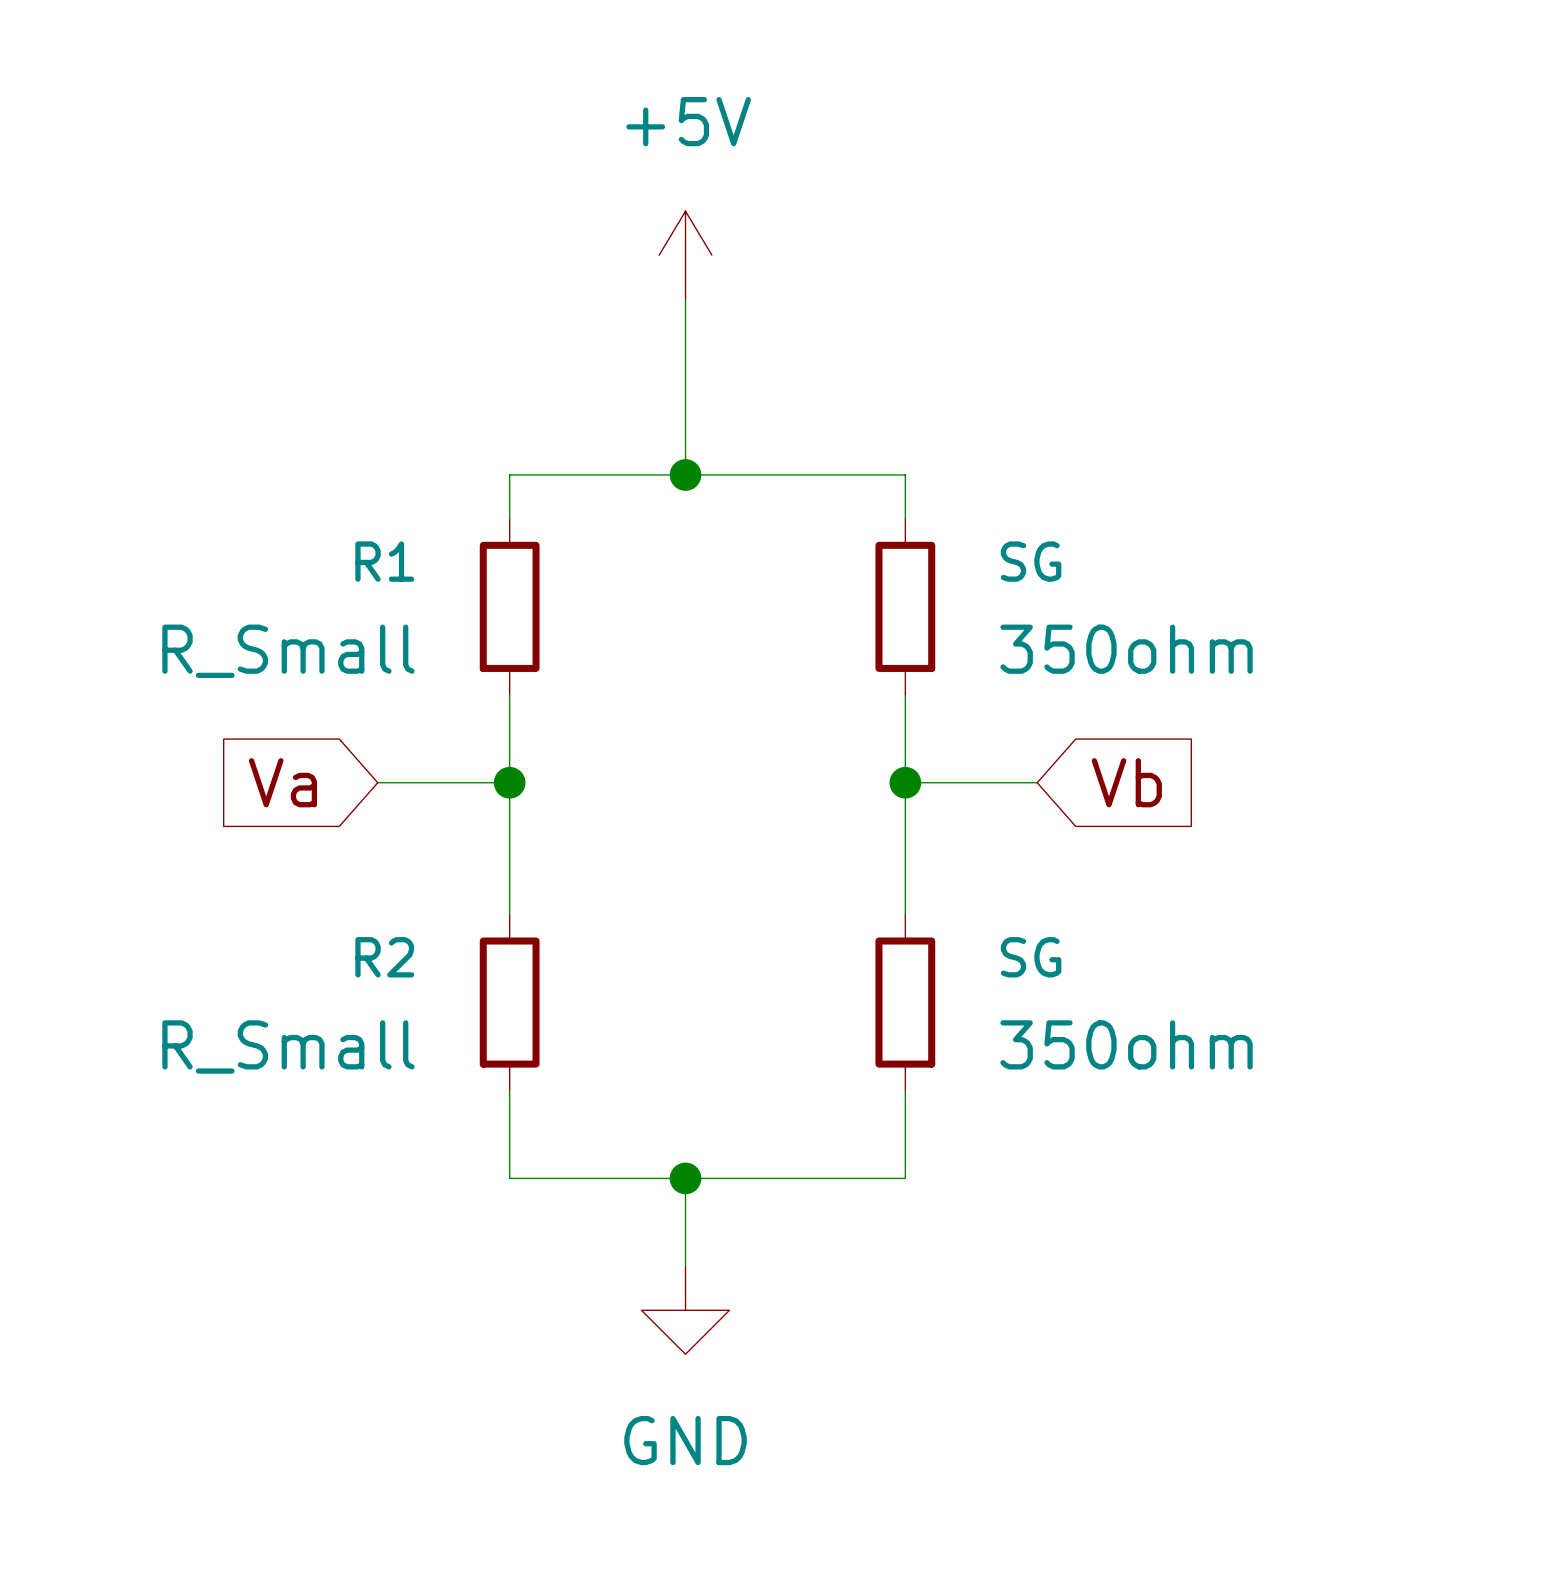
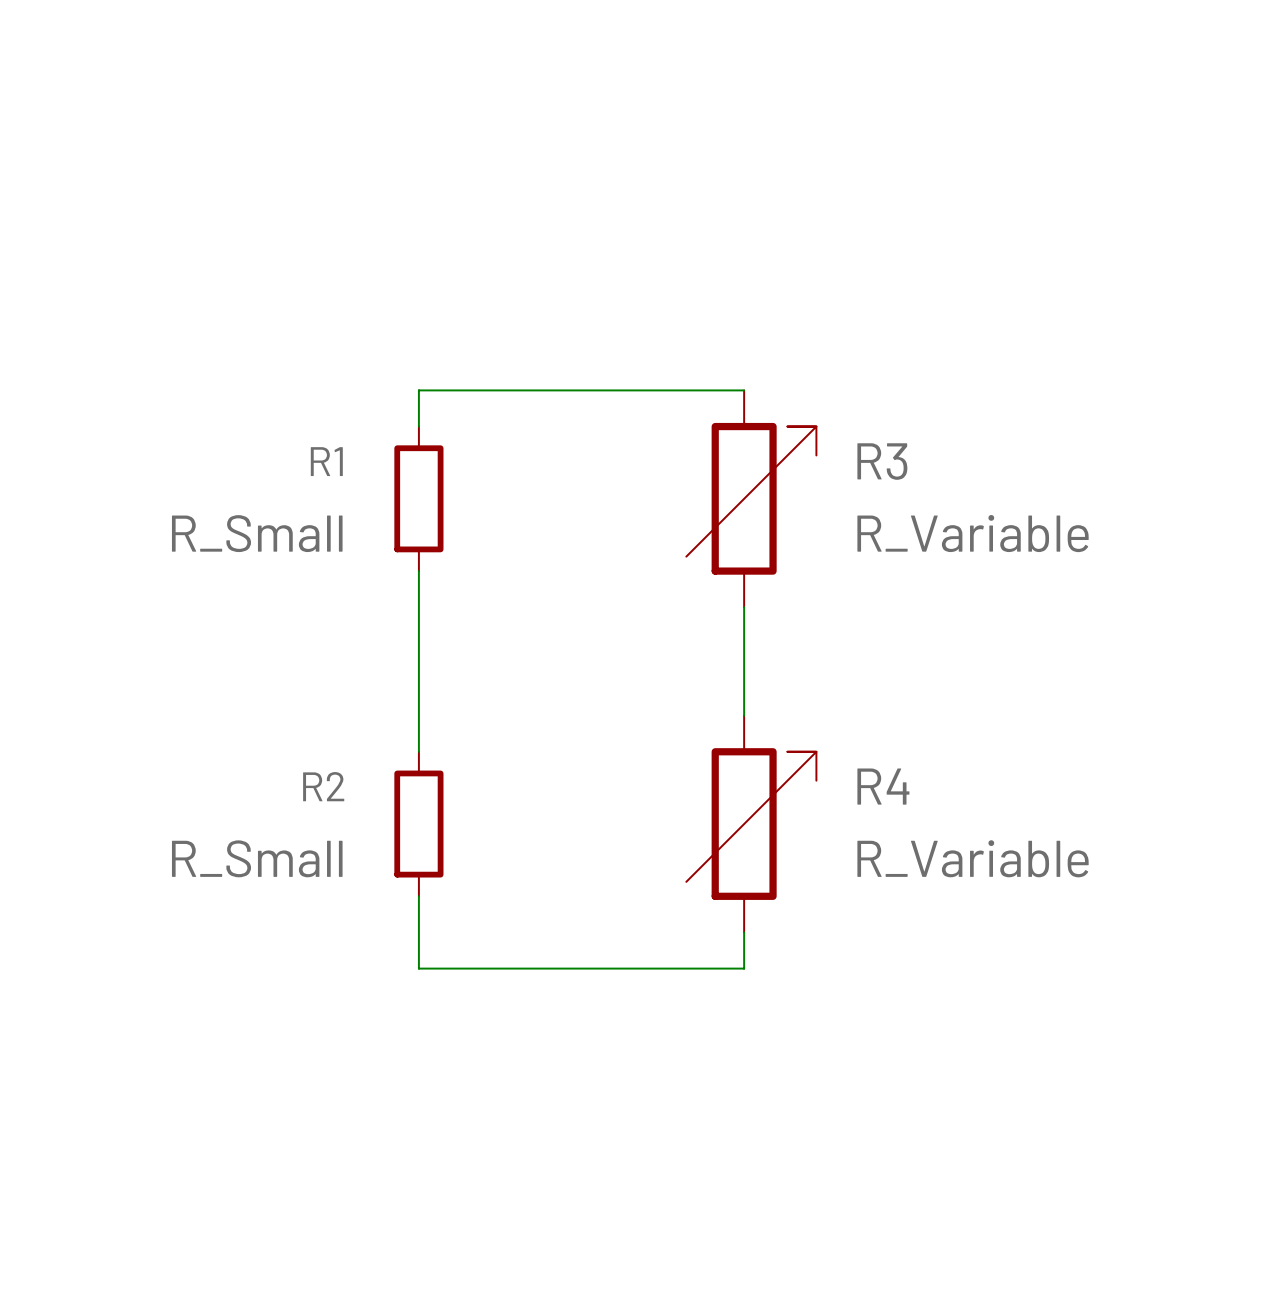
power symbol: +5V (685, 255) -> none
wire: (685, 299) (685, 474) -> none
junction: (685, 474) -> none
SG: 350ohm (905, 606) -> none
R3: none -> R_Variable (751, 498)
global label: Va (282, 782) -> none
wire: (377, 782) (509, 782) -> none
junction: (509, 782) -> none
wire: (905, 782) (1037, 782) -> none
junction: (905, 782) -> none
global label: Vb (1126, 782) -> none
SG: 350ohm (905, 1002) -> none
R4: none -> R_Variable (751, 824)
wire: (685, 1178) (685, 1266) -> none
junction: (685, 1178) -> none
power symbol: GND (685, 1310) -> none

